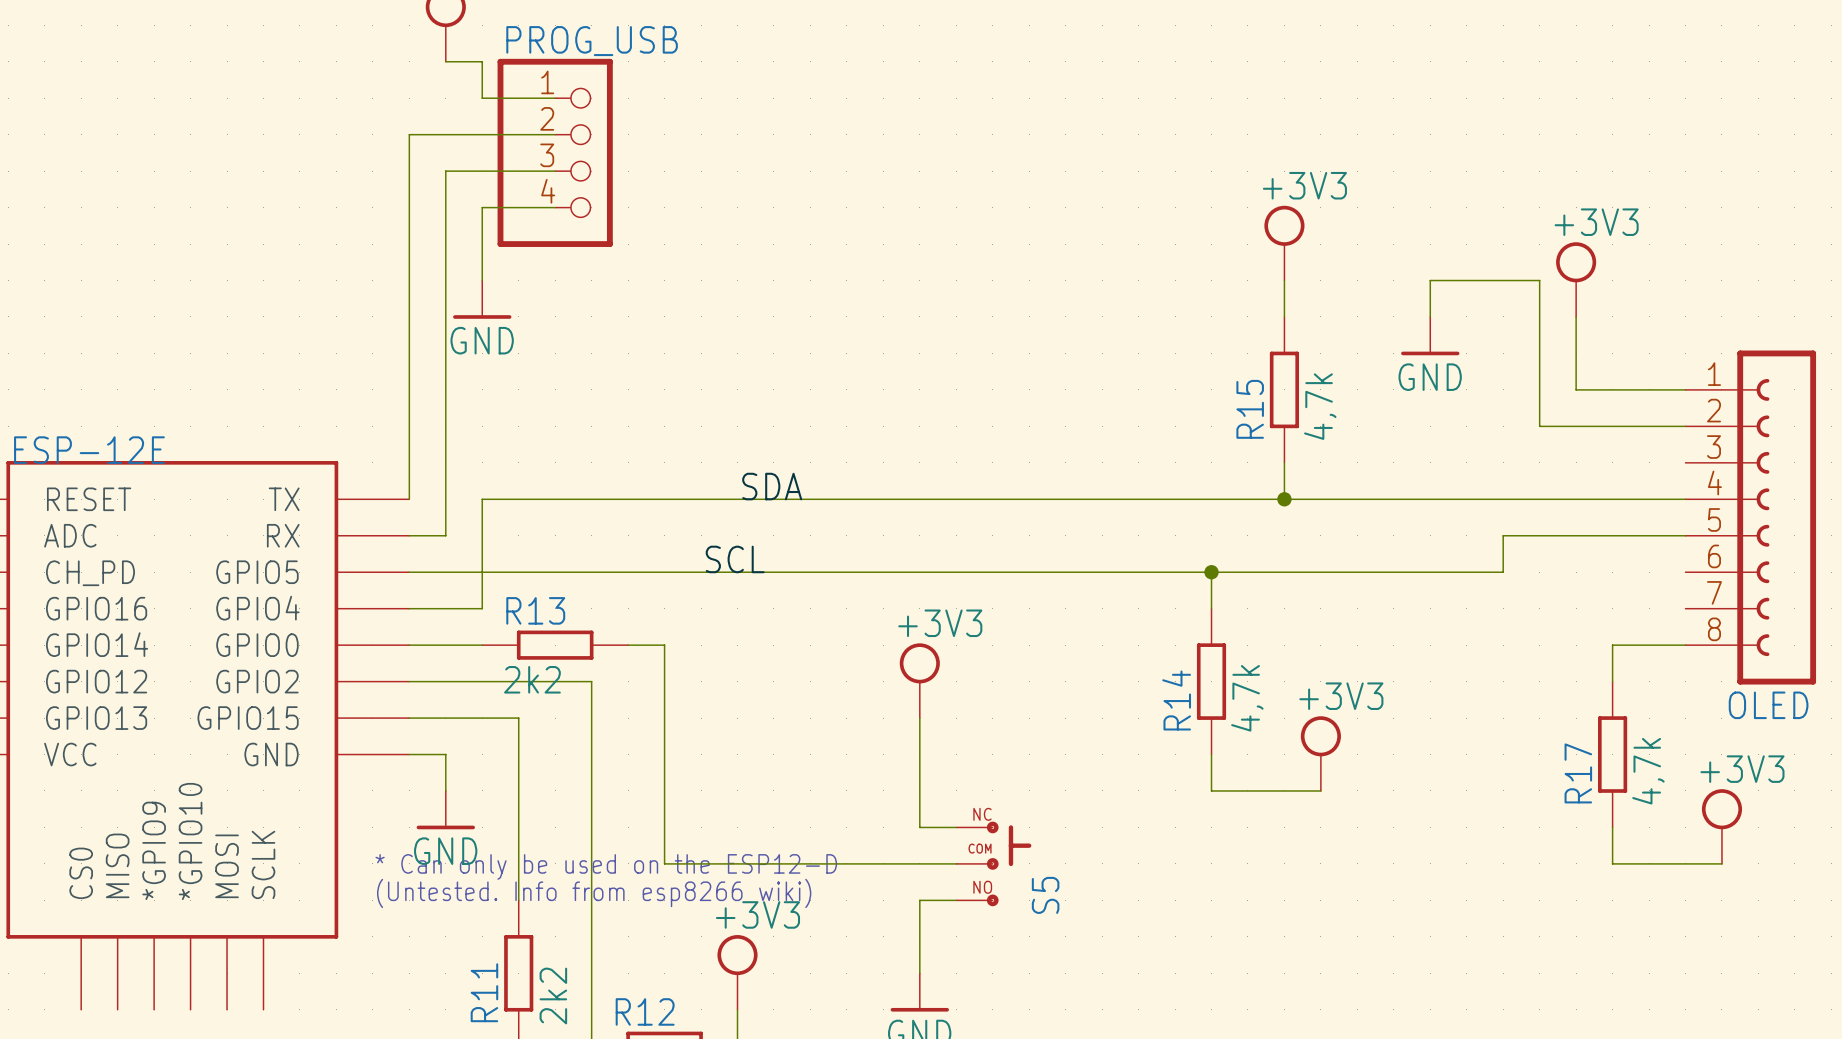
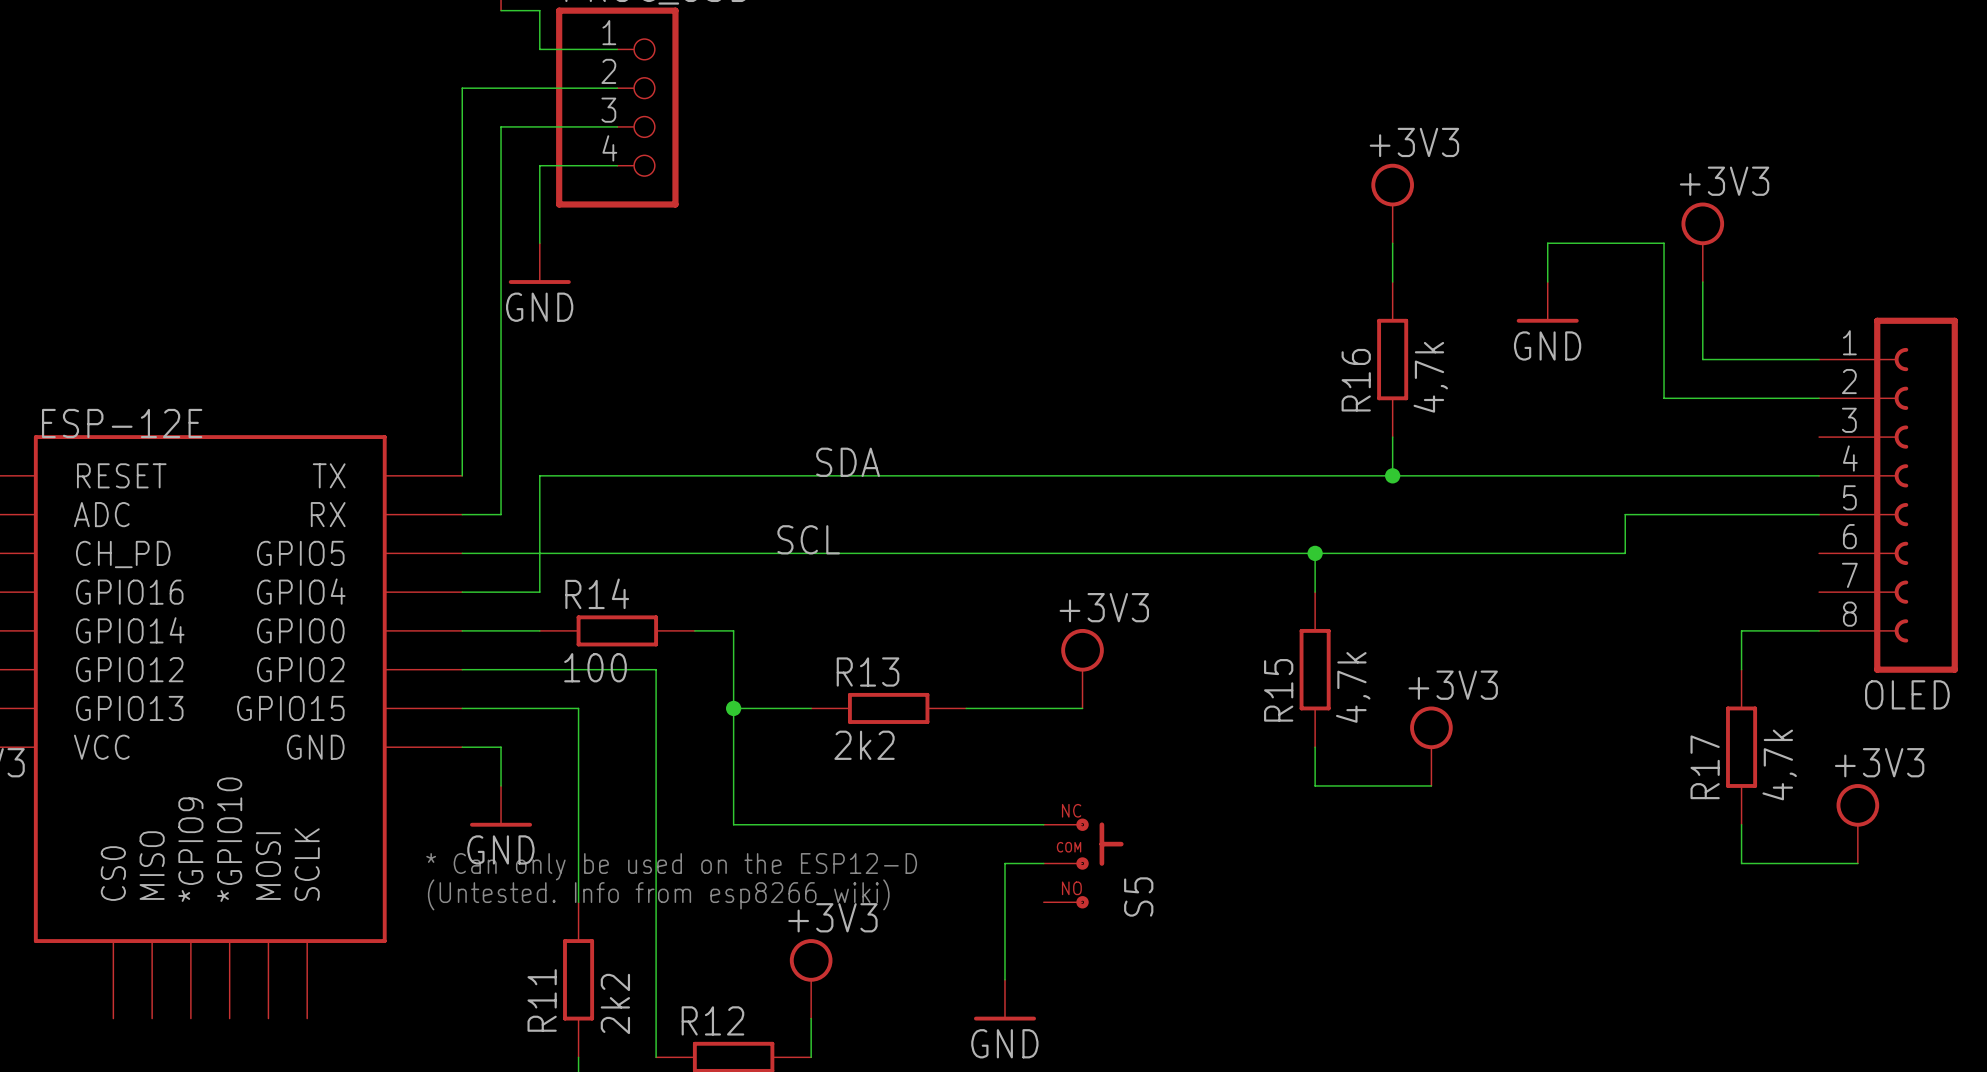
R15 name: R15 (1250, 409) -> R16 (1356, 380)
R13 name: R13 (535, 610) -> R14 (597, 593)
R13 value: 2k2 (532, 679) -> 100 (595, 667)
power symbol position: +3V3 (919, 680) -> +3V3 (1082, 668)
R14 name: R14 (1176, 700) -> R15 (1278, 690)
wire: none -> (733, 708) (811, 708)
junction: none -> (733, 708)
R13: none -> 2k2 (888, 708)
wire: none -> (966, 708) (1082, 708)
wire: (919, 718) (919, 827) -> none
wire: (664, 827) (664, 863) (919, 863) -> (733, 824) (1004, 824)
wire: (919, 900) (956, 900) -> (1004, 902) (1004, 863)

